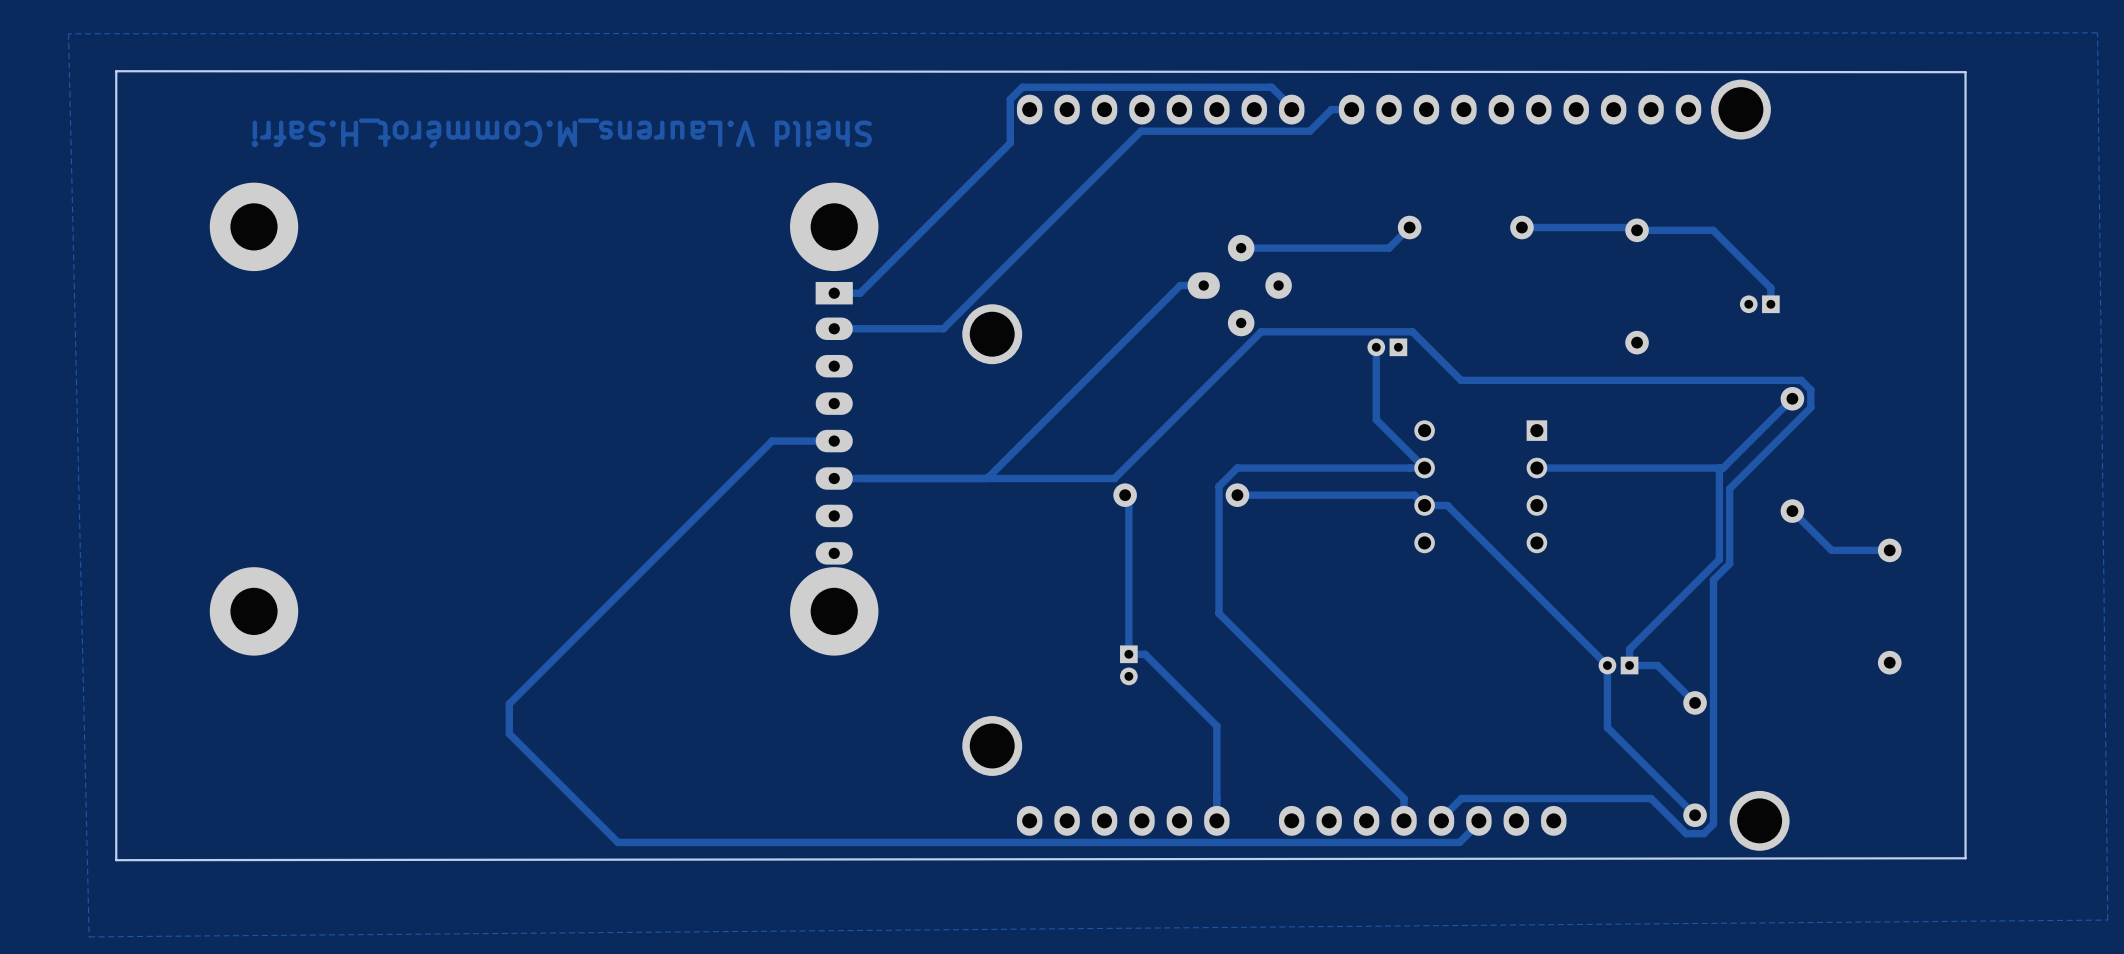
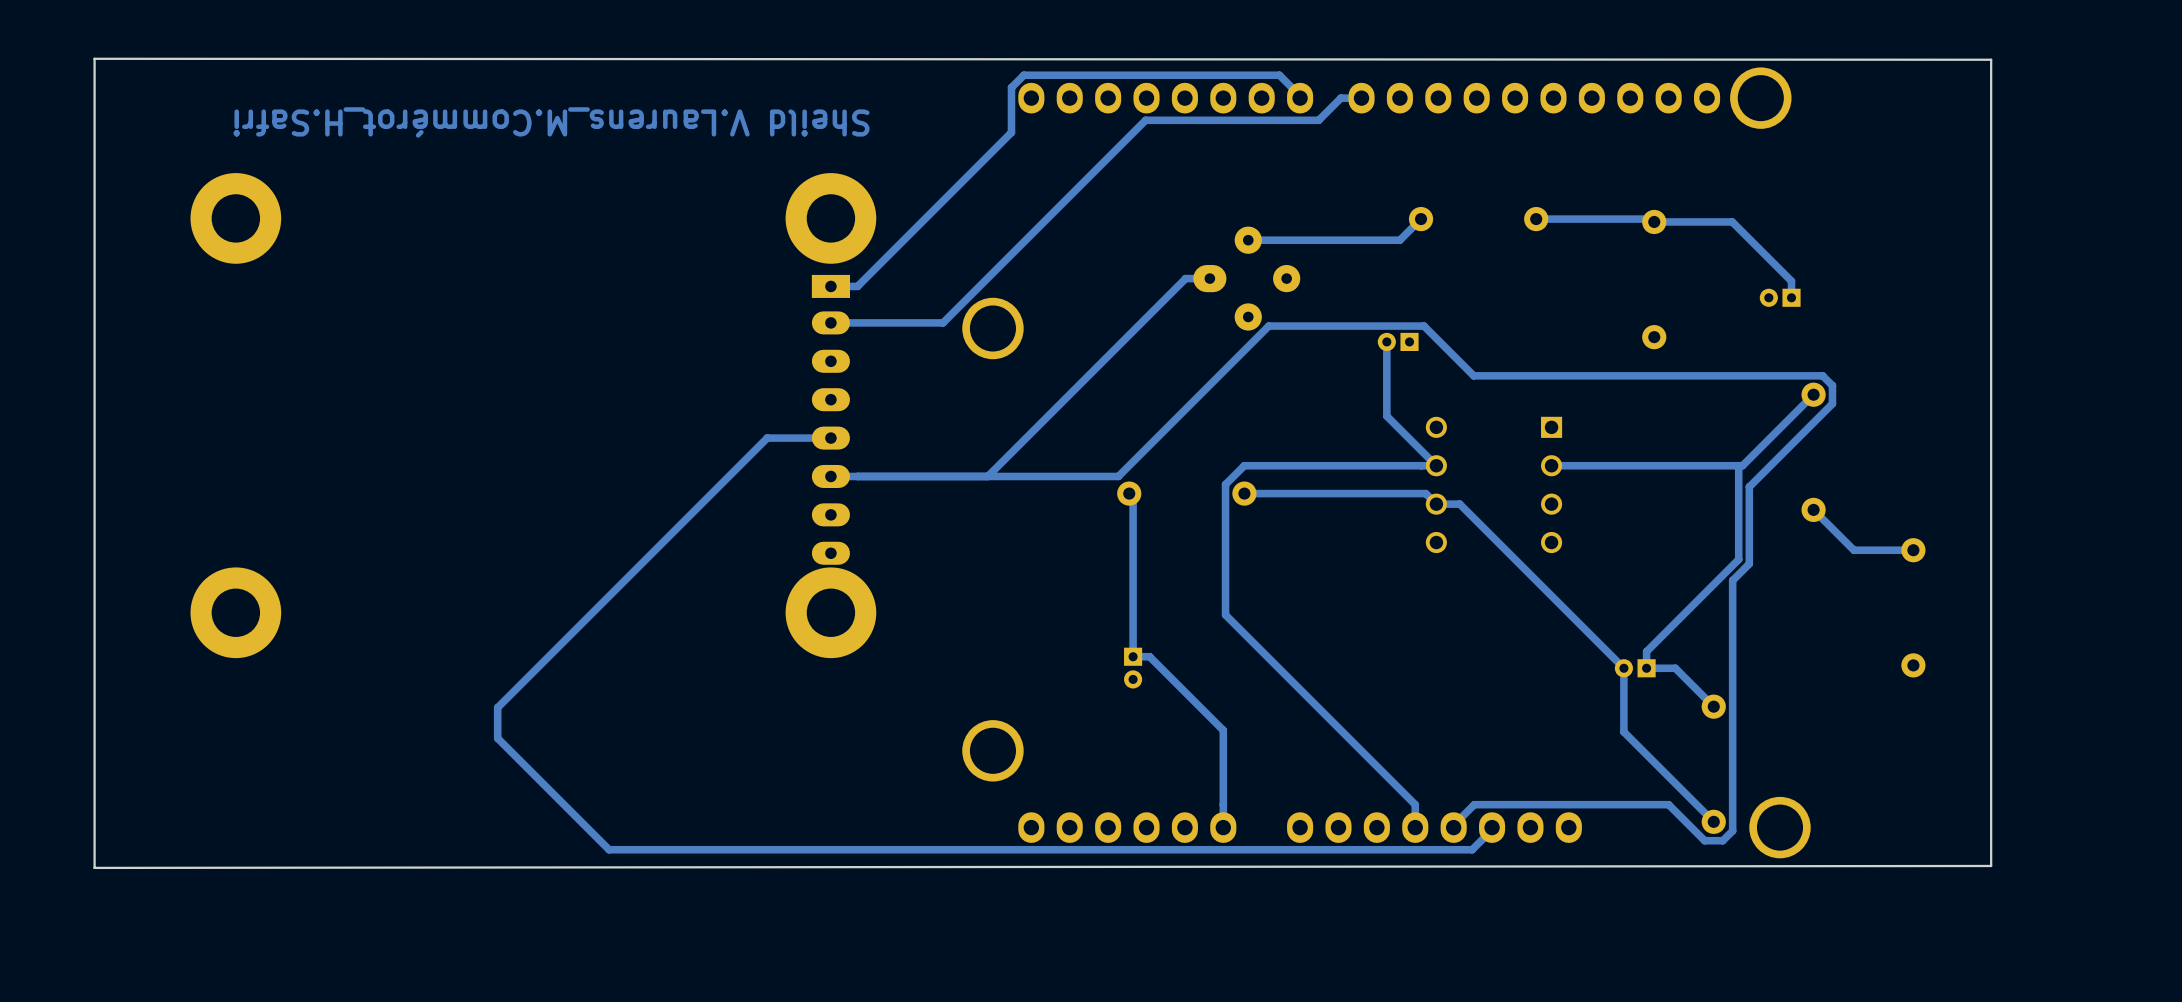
zone outline: (2097, 32) (68, 33) (89, 936) (2107, 920) (2097, 32) -> none

